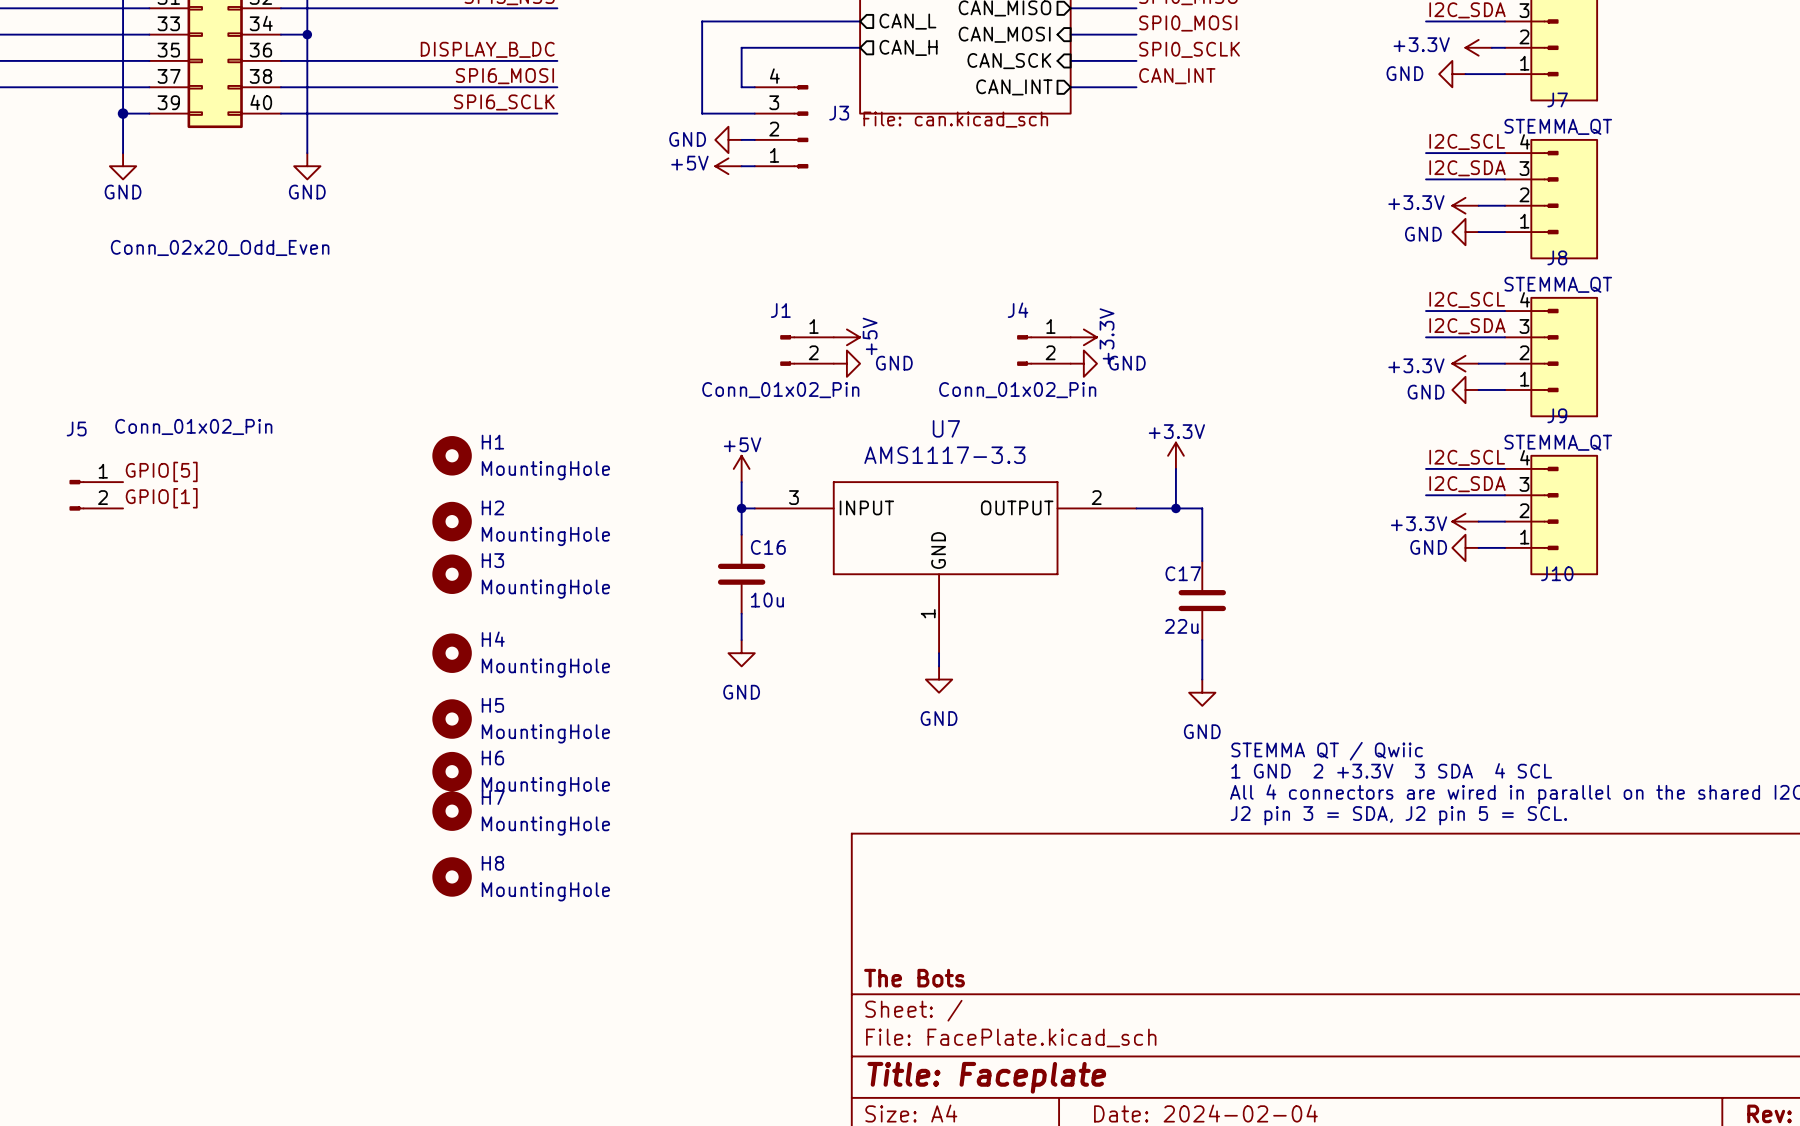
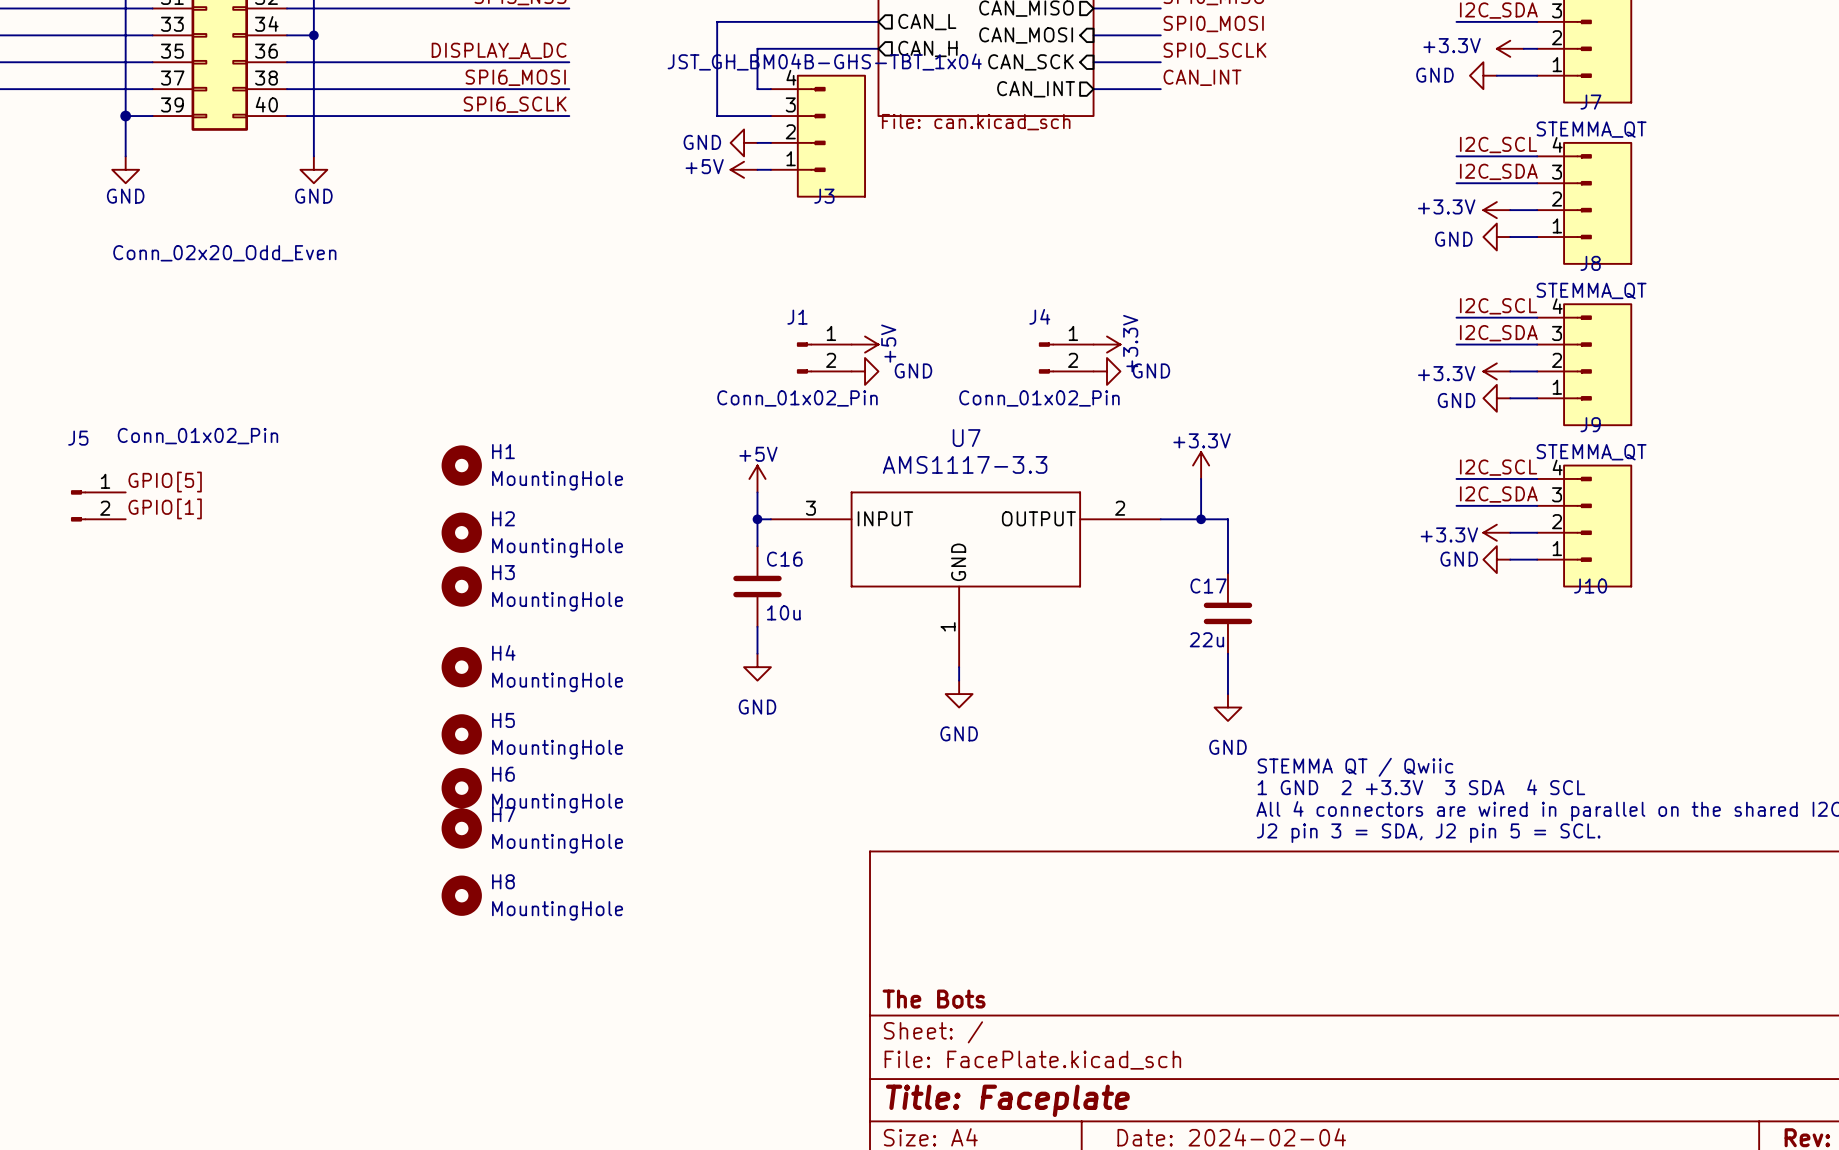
label: DISPLAY_B_DC (487, 49) -> DISPLAY_A_DC (499, 50)
J3 value: none -> JST_GH_BM04B-GHS-TBT_1x04 (824, 62)
J3 symbol: [754, 85, 809, 169] -> [770, 75, 866, 197]
J3 name position: J3 (839, 113) -> J3 (824, 196)

